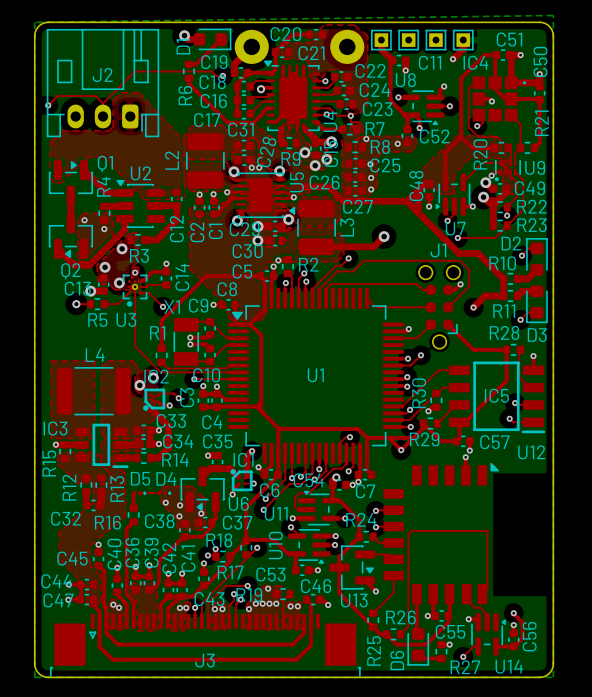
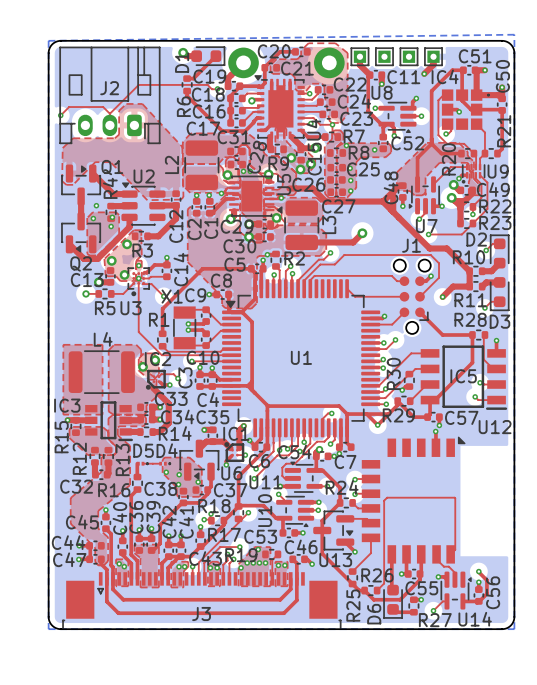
via: none -> (96, 205)
via: none -> (112, 217)

